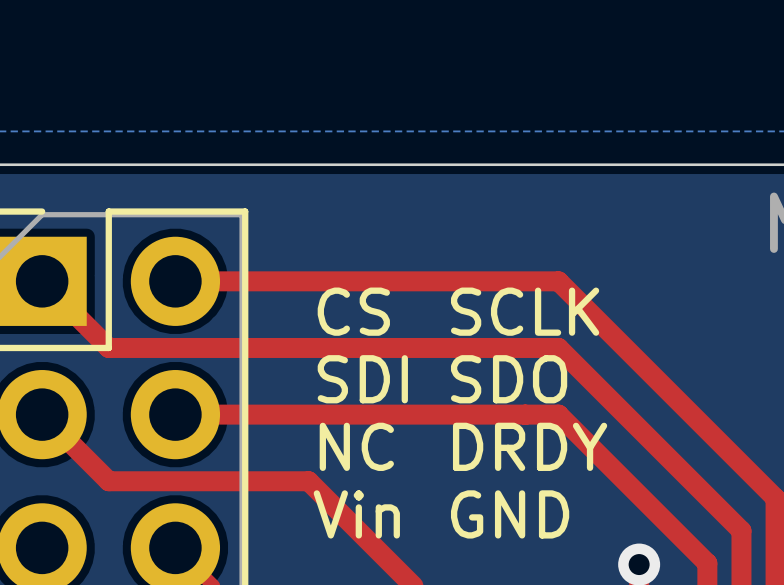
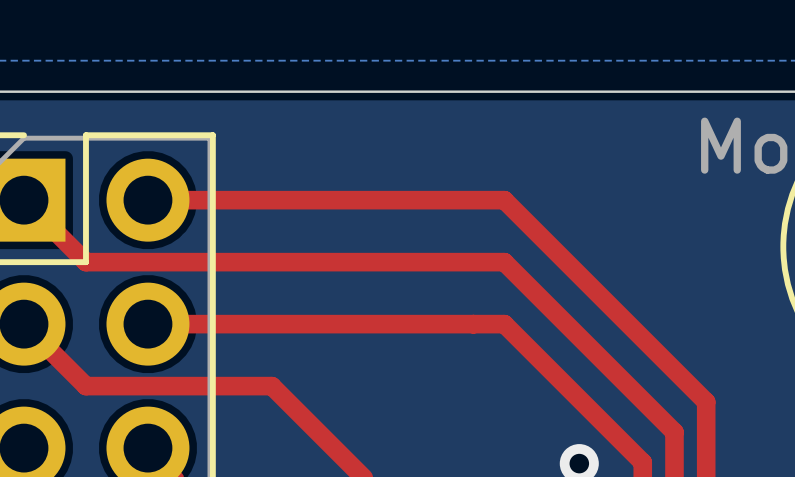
text: CS (353, 311) -> none
text: SCLK (525, 311) -> none
text: SDI (362, 379) -> none
text: SDO (509, 379) -> none
text: NC (356, 446) -> none
text: DRDY (530, 446) -> none
text: Vin (356, 514) -> none
text: GND (510, 514) -> none

